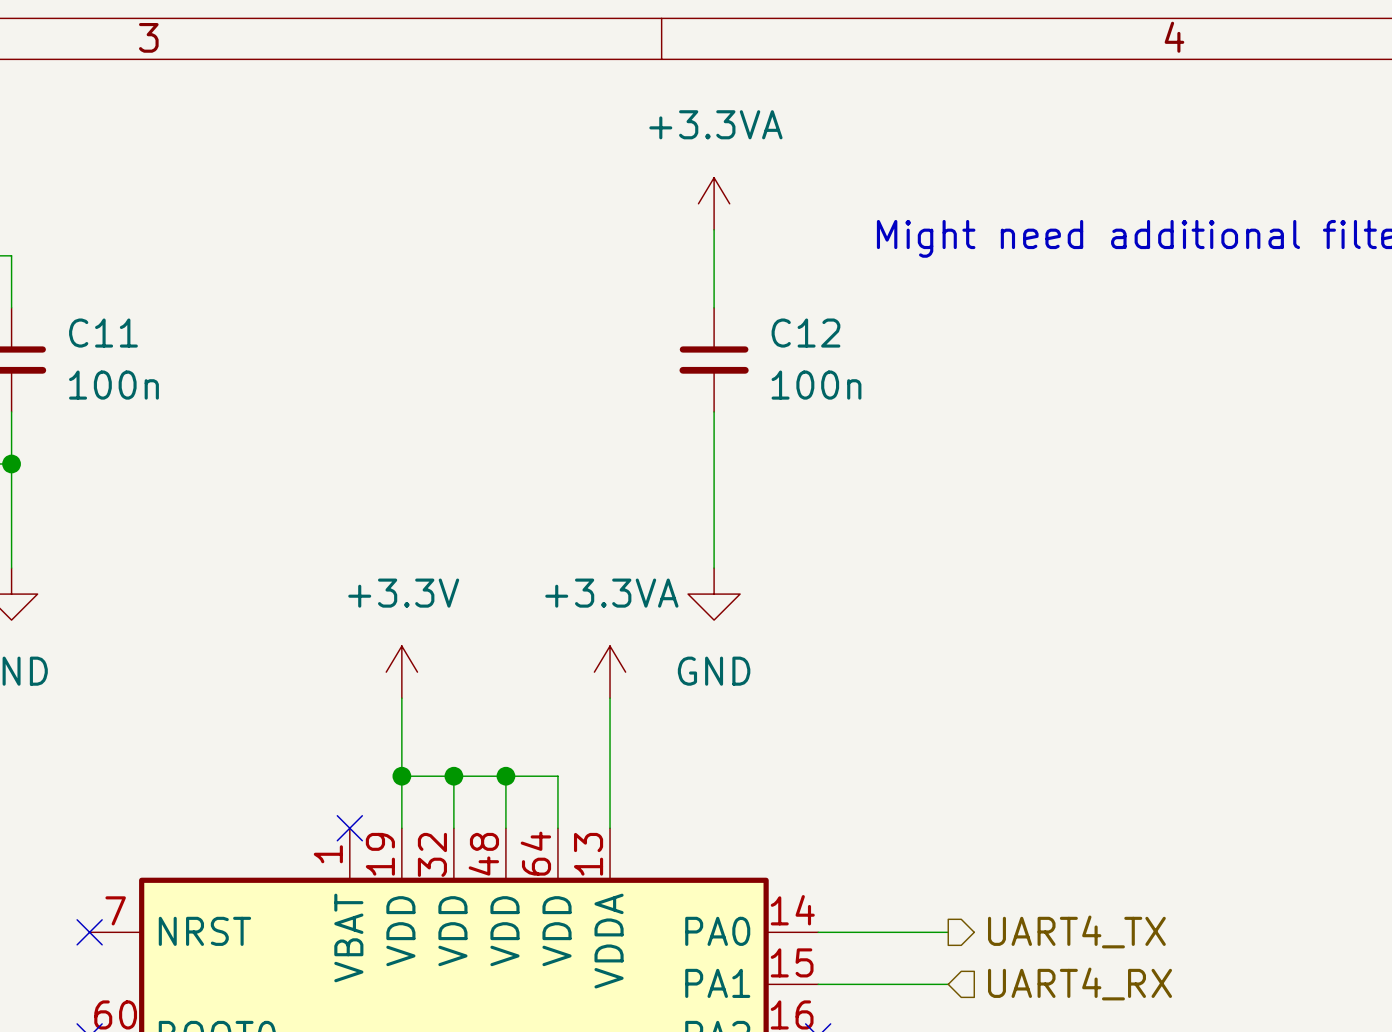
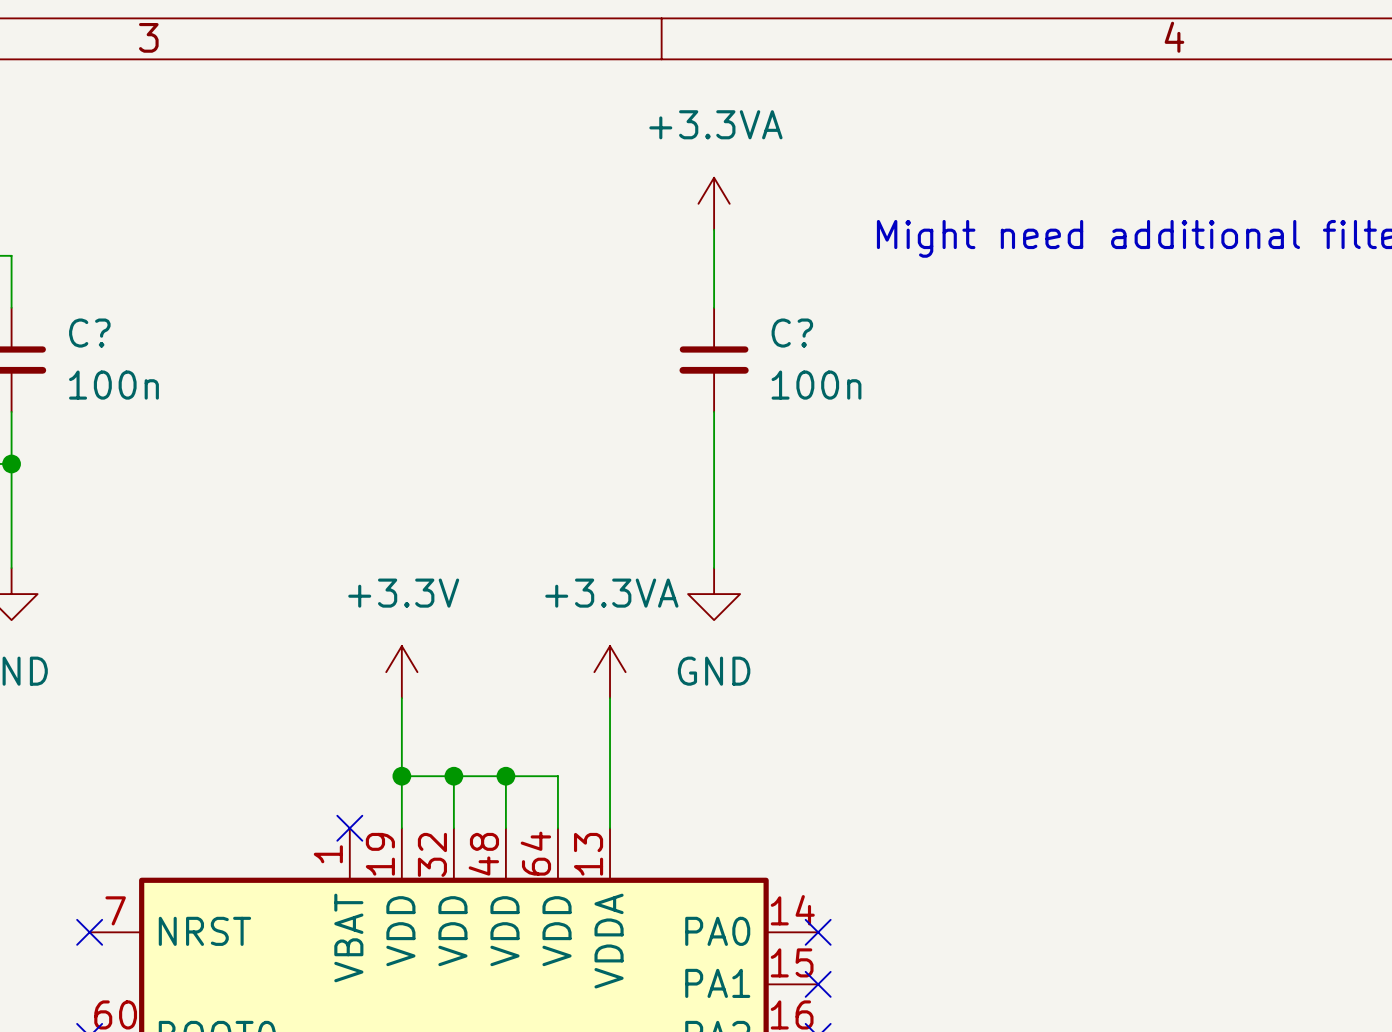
C11 name: C11 (103, 333) -> C? (89, 333)
C12 name: C12 (805, 333) -> C? (792, 333)
hierarchical label: UART4_TX (1076, 931) -> none
wire: (818, 932) (948, 932) -> none
no-connect mark: none -> (818, 932)
wire: (818, 984) (948, 984) -> none
no-connect mark: none -> (818, 984)
hierarchical label: UART4_RX (1079, 984) -> none

